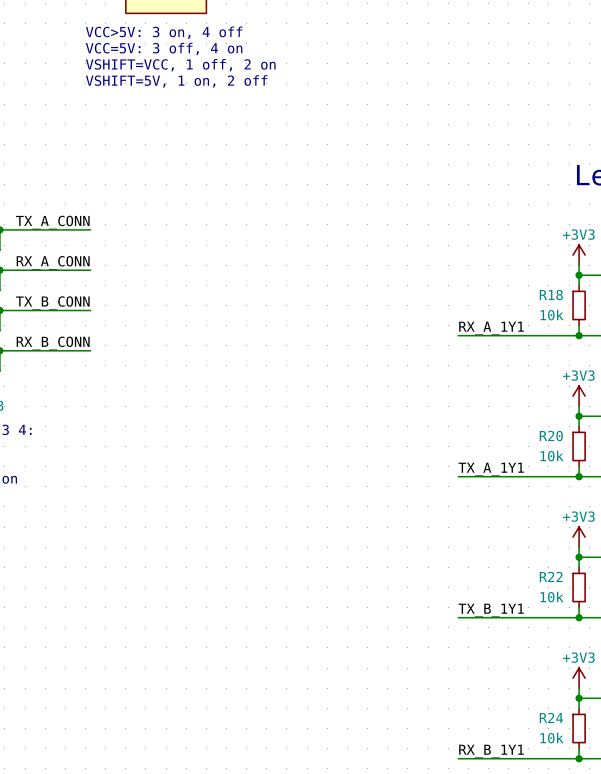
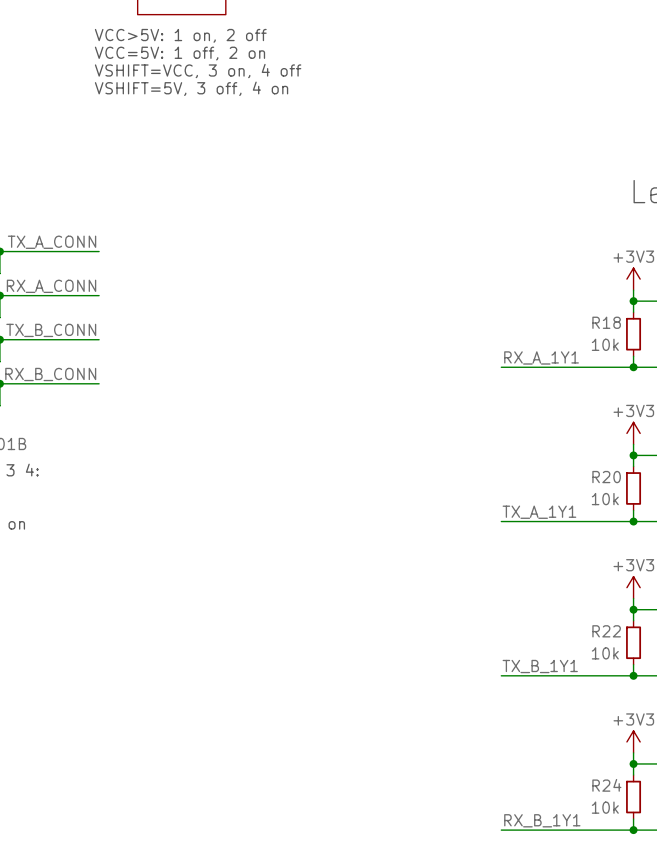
text: VCC>5V: 3 on, 4 off (164, 32) -> VCC>5V: 1 on, 2 off (180, 35)
text: VCC=5V: 3 off, 4 on (164, 48) -> VCC=5V: 1 off, 2 on (179, 53)
text: VSHIFT=VCC, 1 off, 2 on (180, 65) -> VSHIFT=VCC, 3 on, 4 off (198, 71)
text: VSHIFT=5V, 1 on, 2 off (176, 81) -> VSHIFT=5V, 3 off, 4 on (191, 88)

